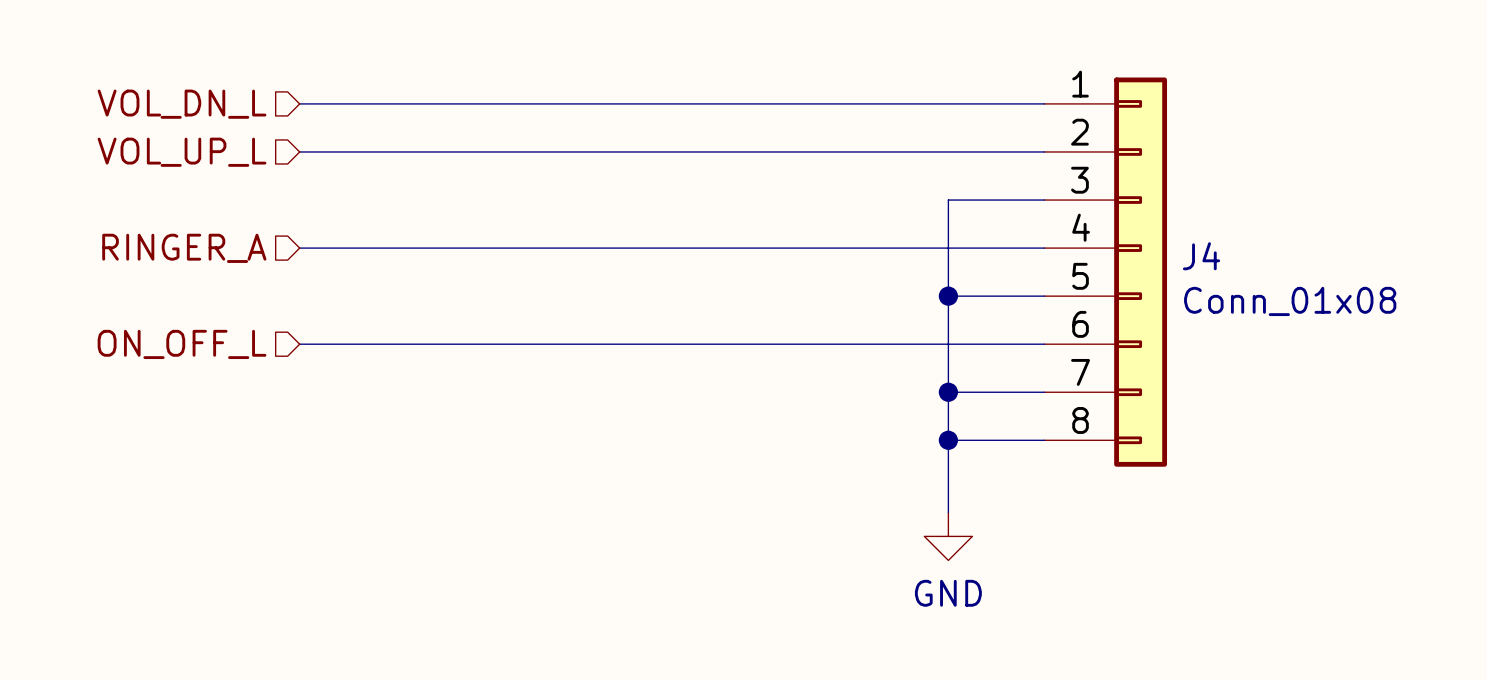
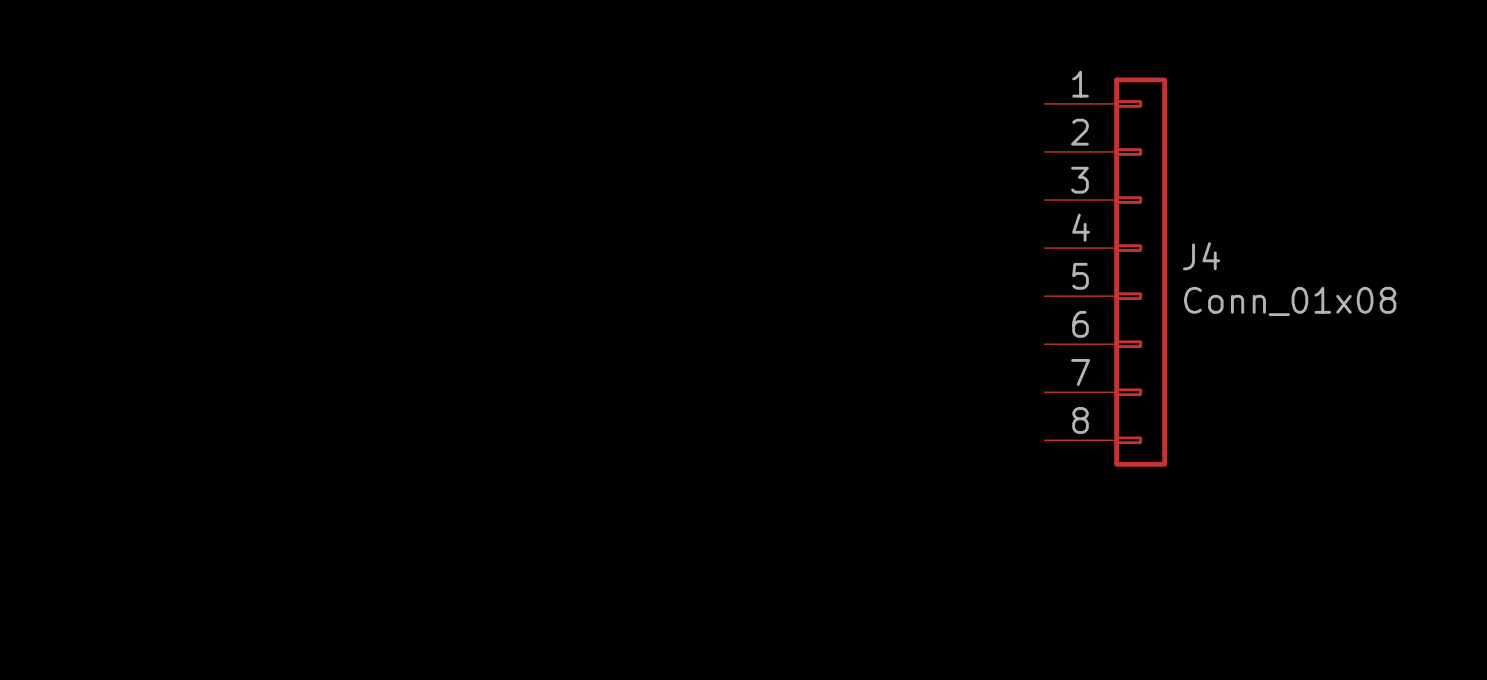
wire: (299, 103) (1044, 103) -> none
hierarchical label: VOL_DN_L (182, 104) -> none
wire: (299, 151) (1044, 151) -> none
hierarchical label: VOL_UP_L (182, 152) -> none
wire: (1044, 200) (948, 200) (948, 512) -> none
hierarchical label: RINGER_A (184, 248) -> none
wire: (299, 248) (1044, 248) -> none
wire: (948, 296) (1044, 296) -> none
junction: (948, 296) -> none
hierarchical label: ON_OFF_L (182, 344) -> none
wire: (299, 344) (1044, 344) -> none
wire: (948, 392) (1044, 392) -> none
junction: (948, 392) -> none
wire: (948, 440) (1044, 440) -> none
junction: (948, 440) -> none
power symbol: GND (948, 536) -> none

